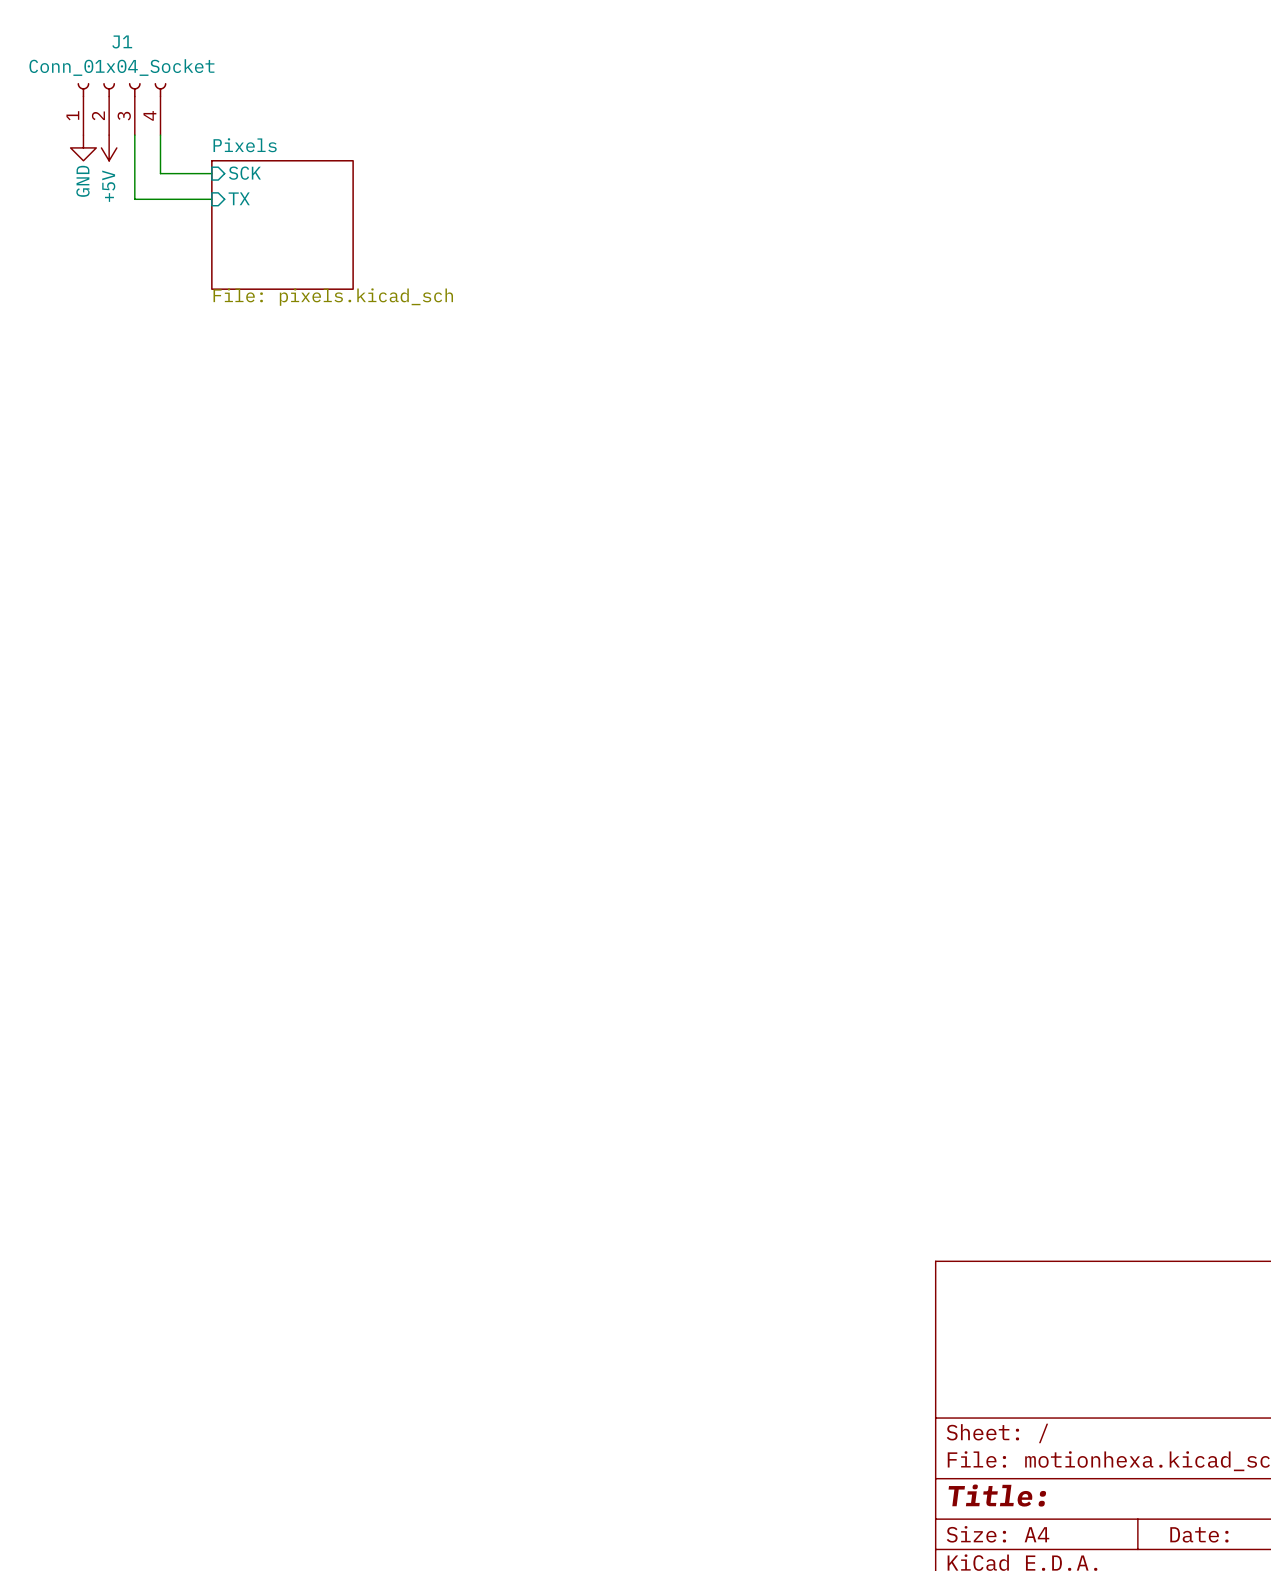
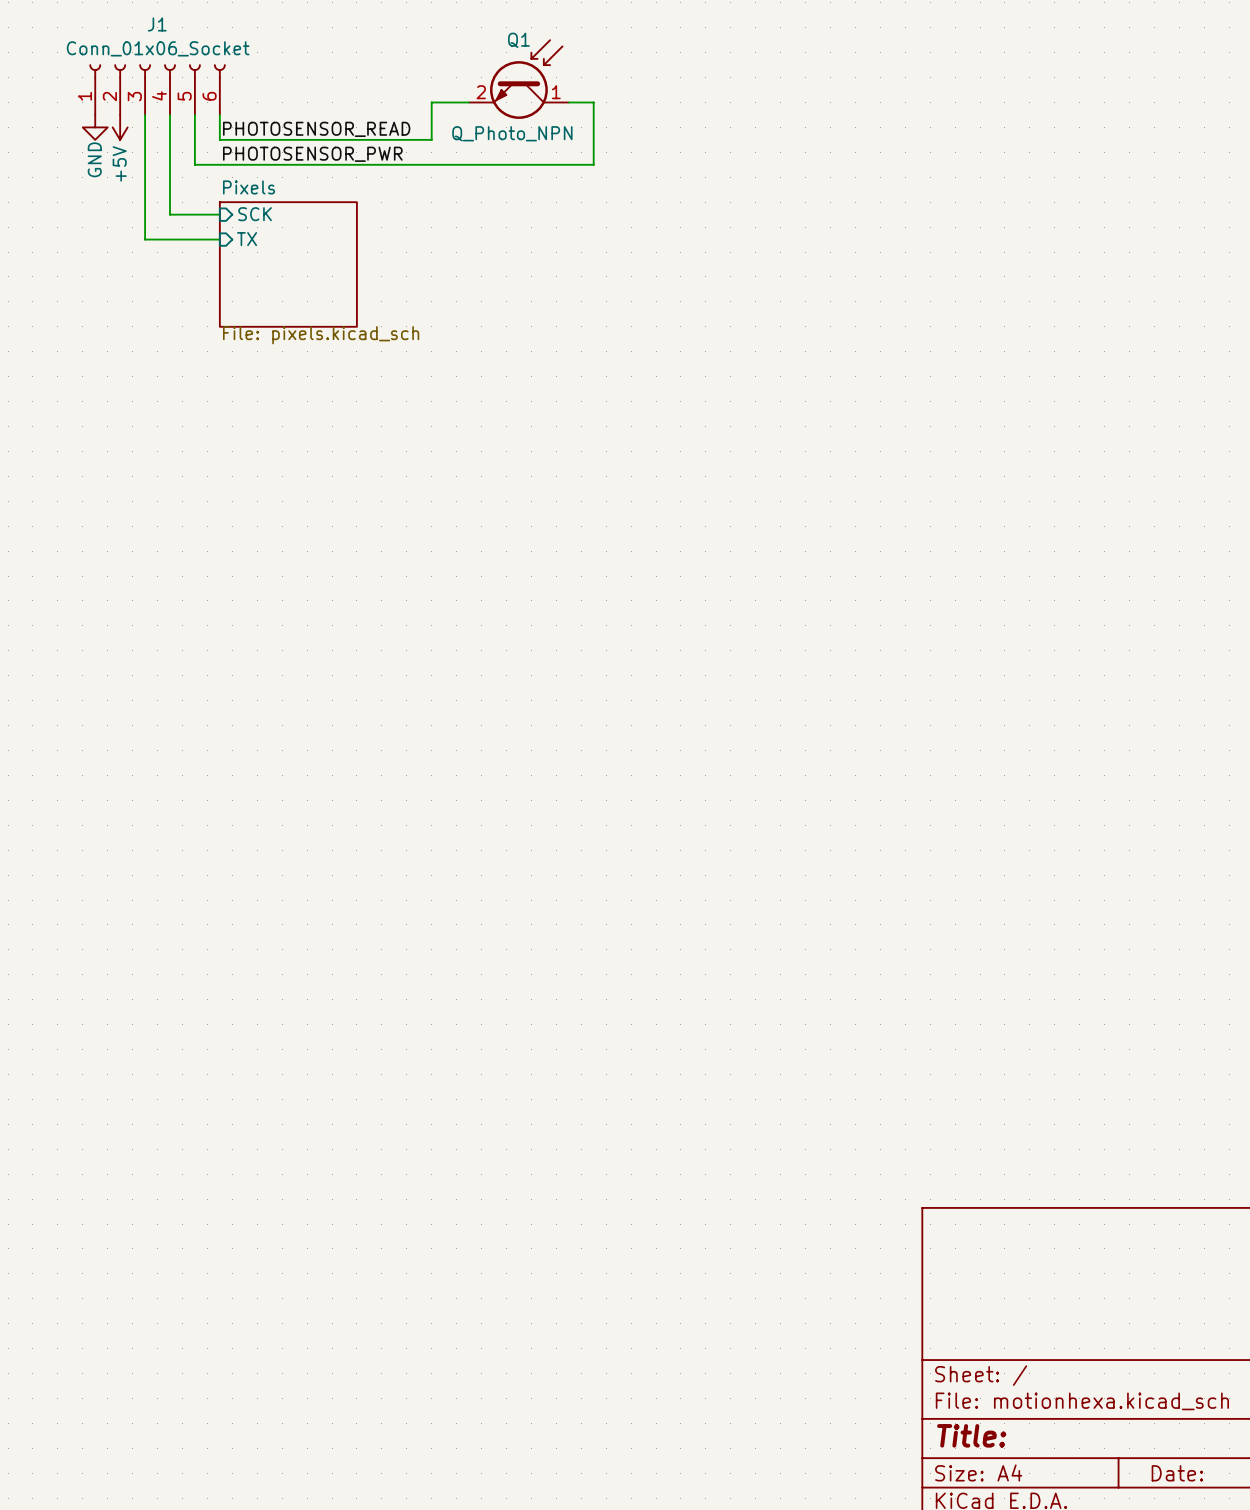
J1 value: Conn_01x04_Socket (121, 67) -> Conn_01x06_Socket (158, 48)
J1 symbol: [77, 82, 167, 136] -> [89, 64, 226, 115]
Q1: none -> Q_Photo_NPN (518, 79)
wire: none -> (469, 102) (431, 102) (431, 139) (219, 139) (219, 114)
wire: none -> (568, 102) (593, 102) (593, 164) (194, 164) (194, 114)
label: none -> PHOTOSENSOR_READ (316, 129)
wire: (160, 173) (211, 173) -> (170, 152) (170, 214) (219, 214)
sheet pin position: SCK (244, 173) -> SCK (255, 214)
label: none -> PHOTOSENSOR_PWR (312, 154)
sheet pin position: TX (239, 198) -> TX (247, 239)
wire: (134, 199) (211, 199) -> (145, 177) (145, 239) (219, 239)
sheet Pixels position: (282, 224) -> (288, 264)

